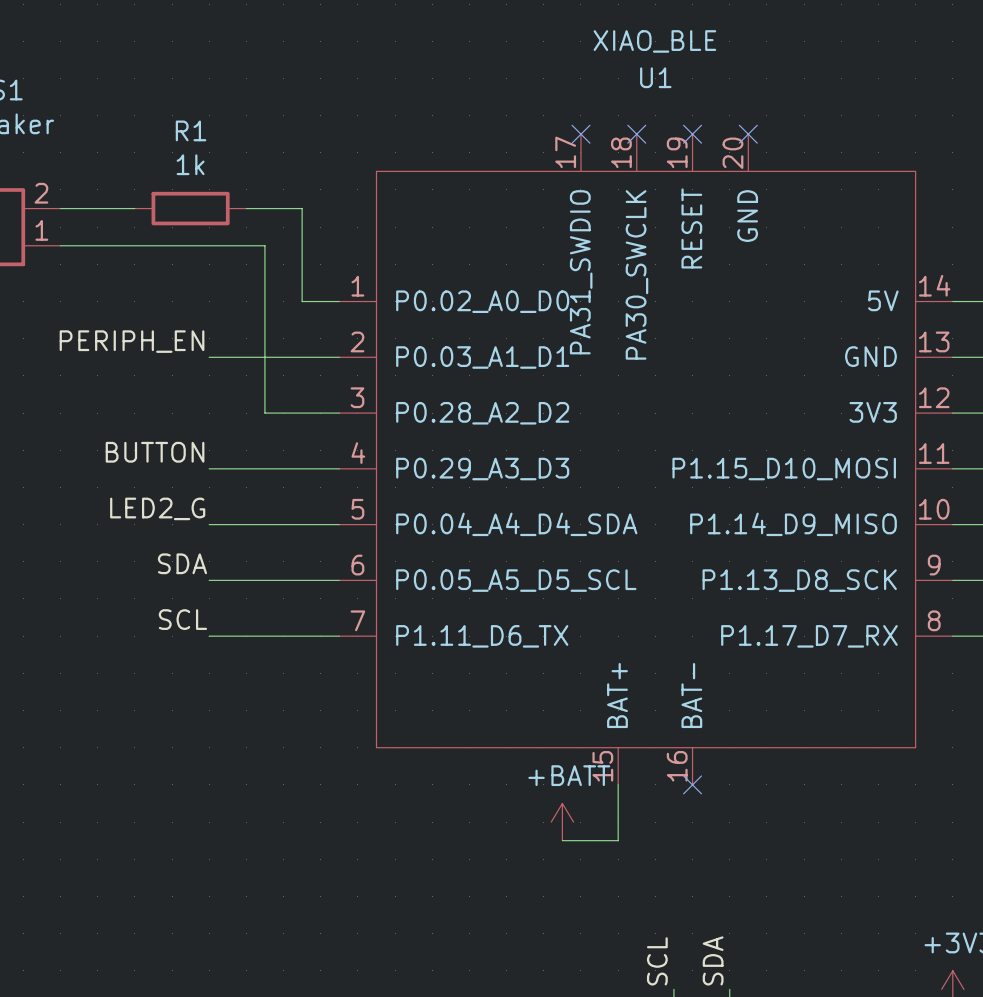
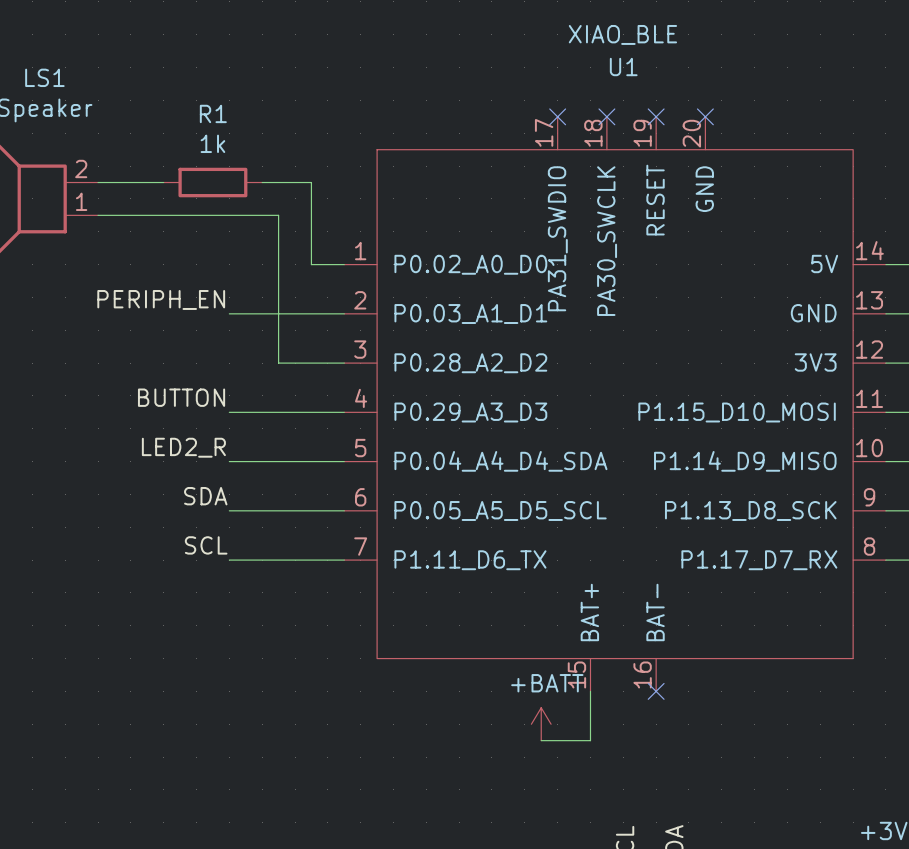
label: LED2_G (157, 508) -> LED2_R (183, 447)

